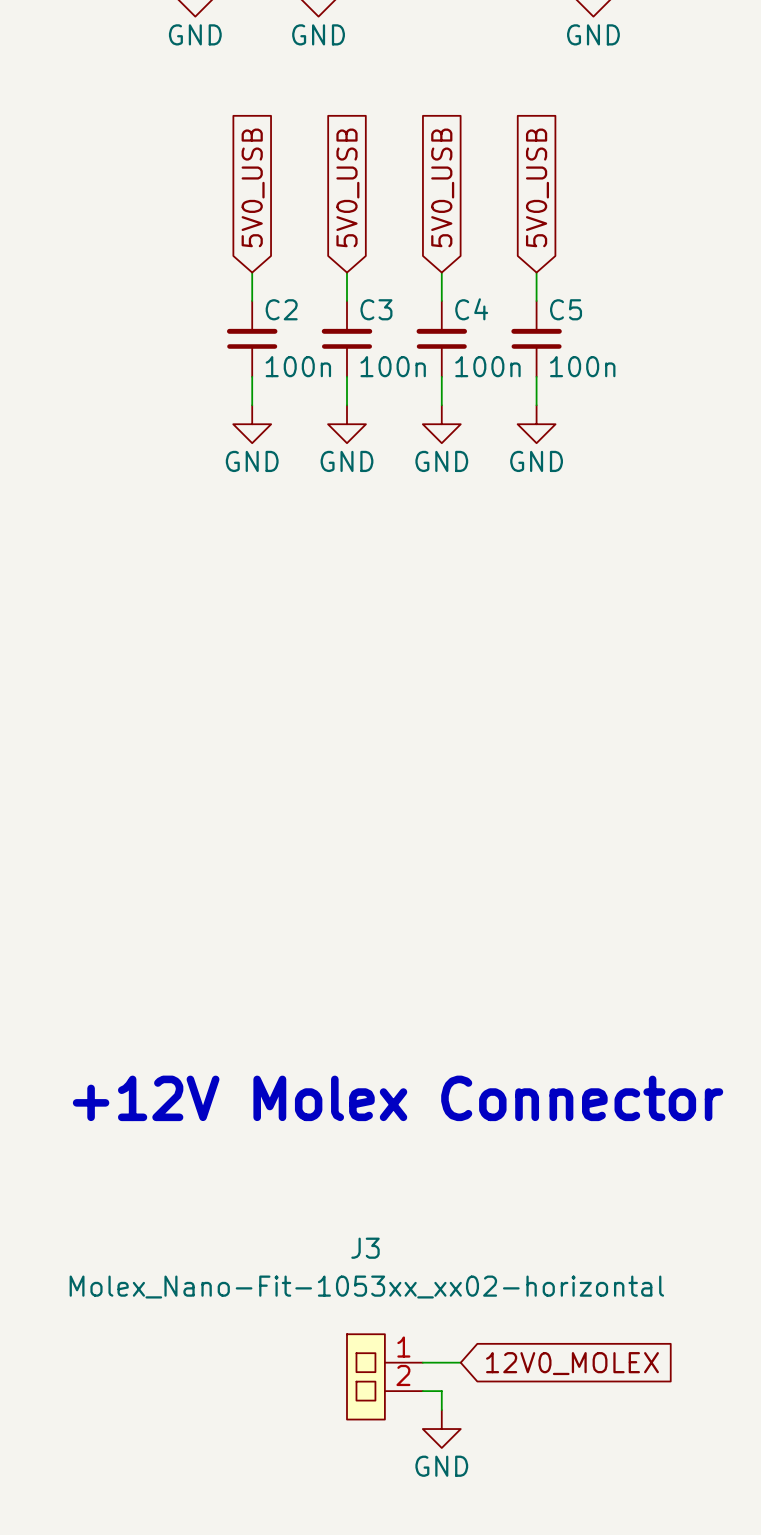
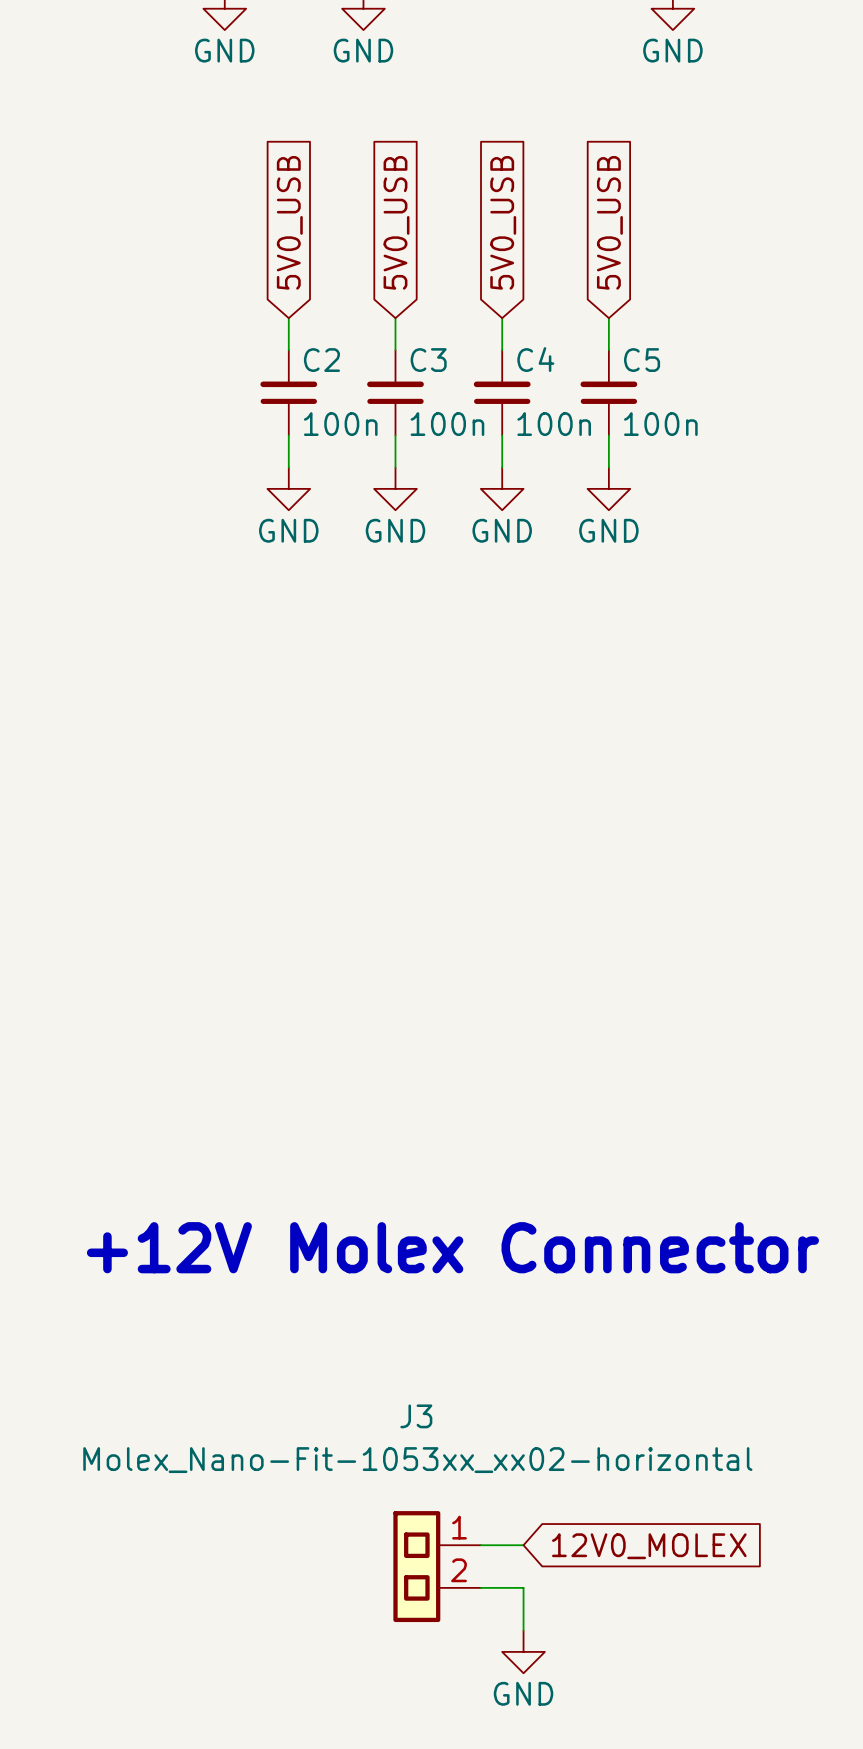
J3 symbol: [346, 1334, 423, 1420] -> [393, 1511, 481, 1623]
wire: (422, 1391) (441, 1391) (441, 1410) -> none
wire: none -> (480, 1587) (523, 1587) (523, 1630)
power symbol position: GND (441, 1429) -> GND (523, 1651)

